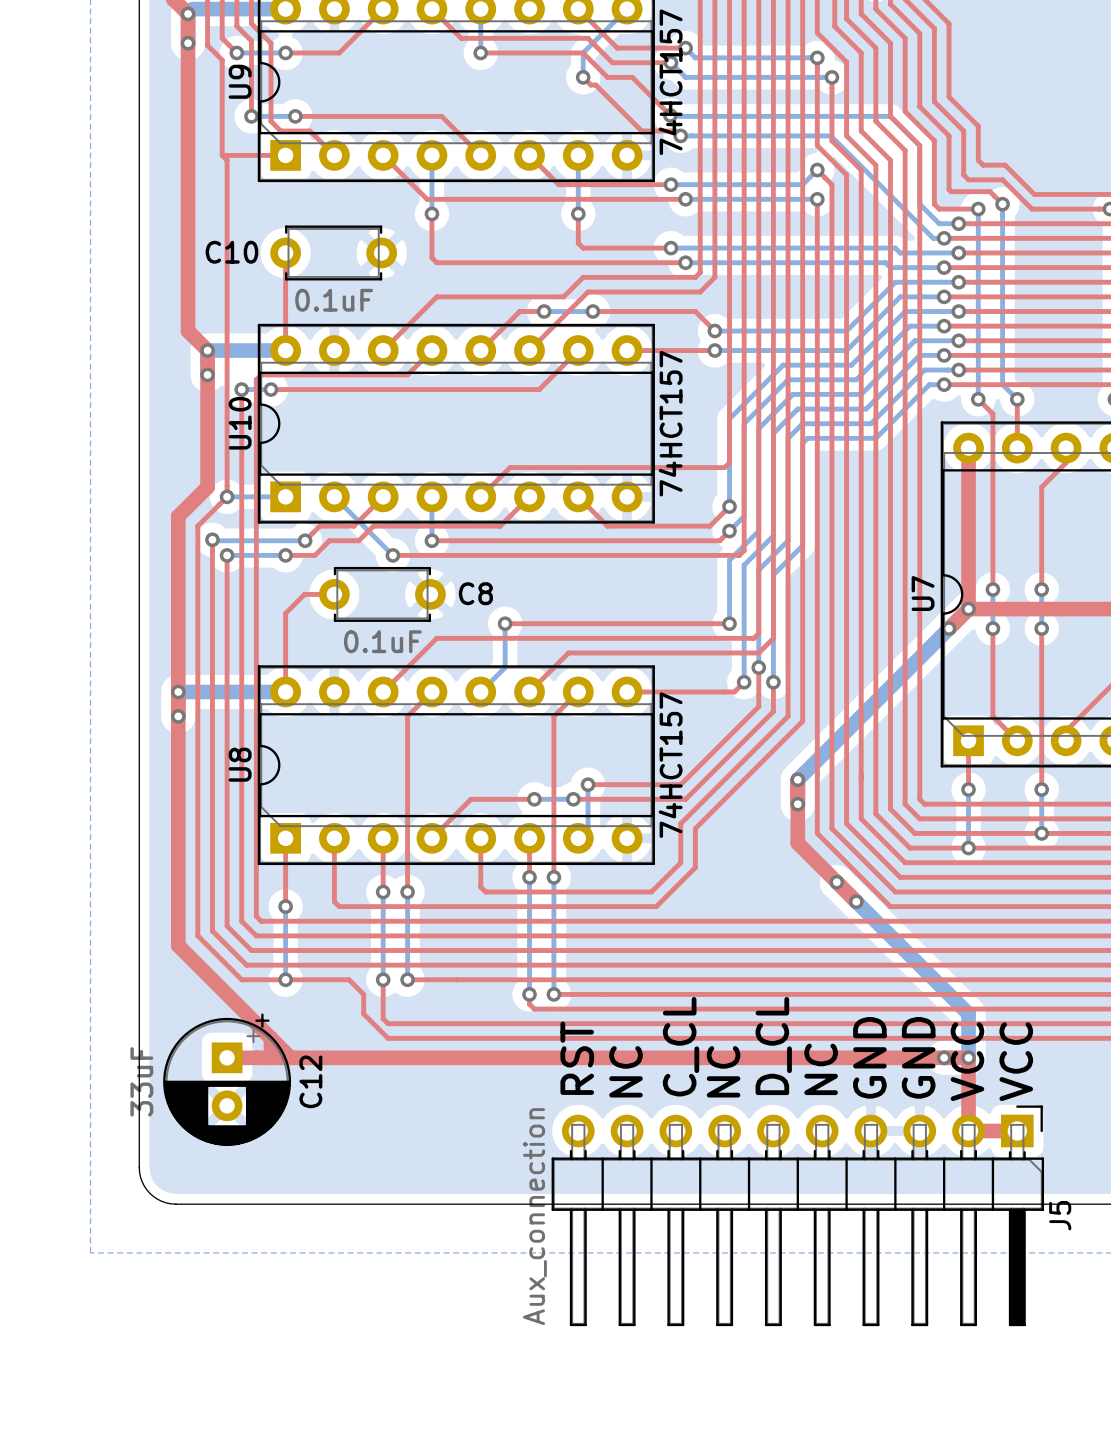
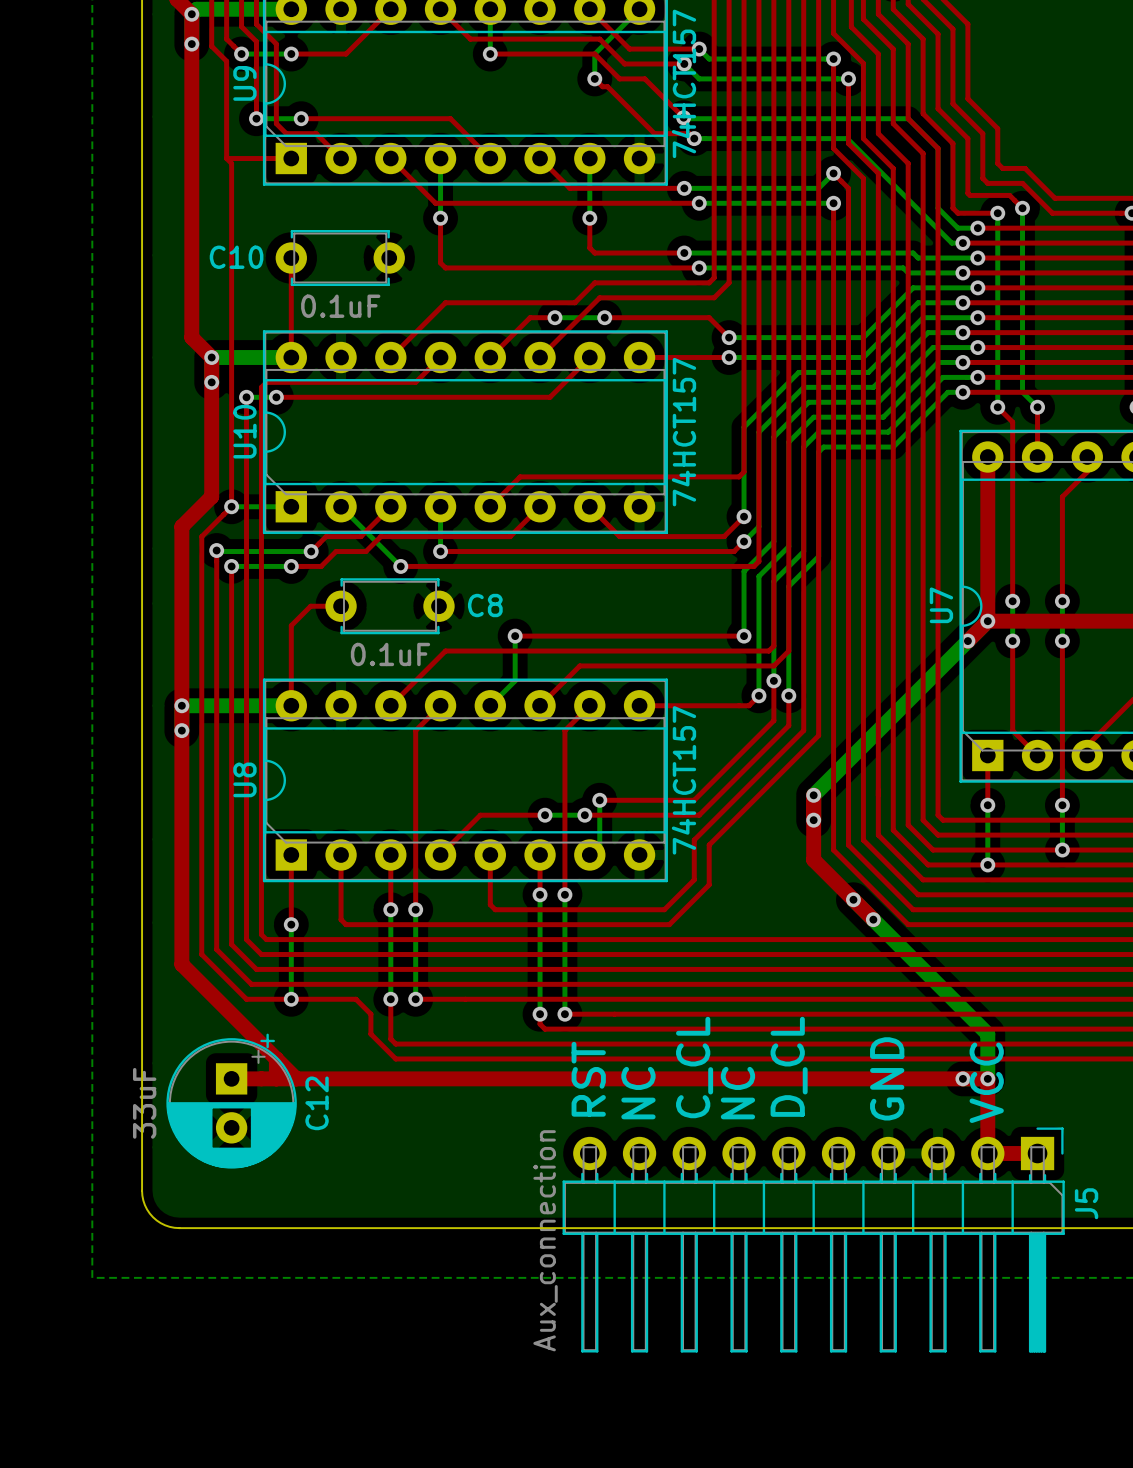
J5 text: GND (918, 1057) -> none
J5 text: VCC (1016, 1061) -> none
J5 text: NC (821, 1069) -> none
J5 name position: J5 (1060, 1215) -> J5 (1086, 1203)

